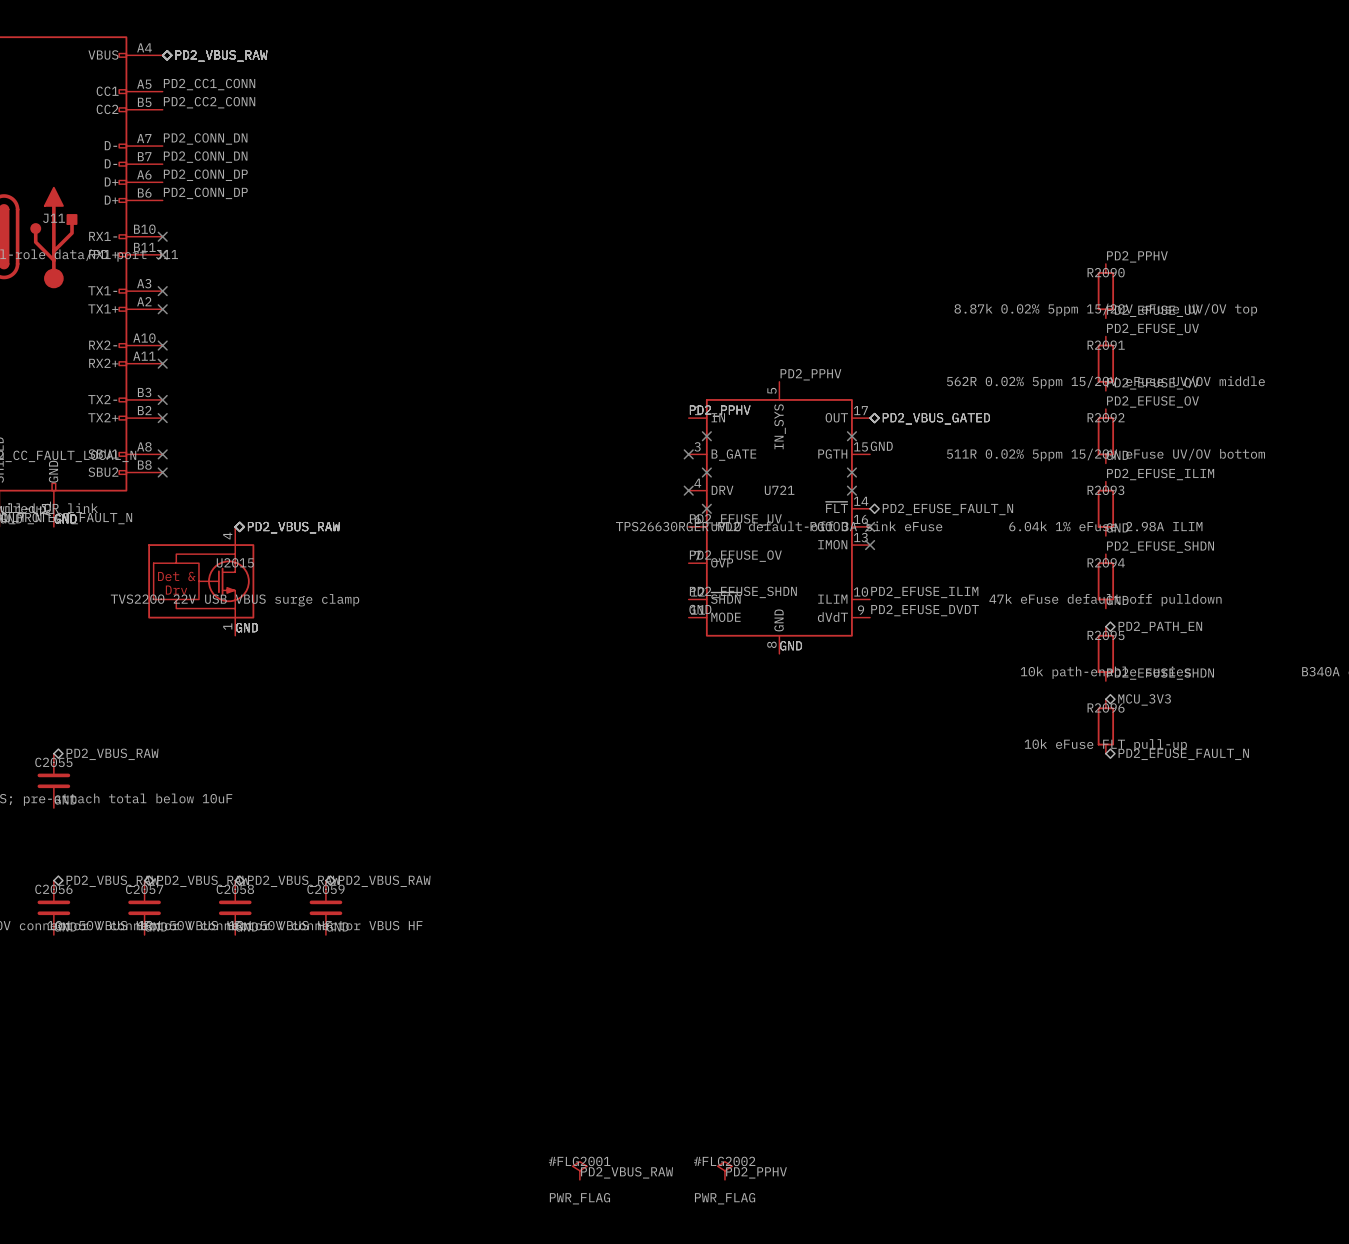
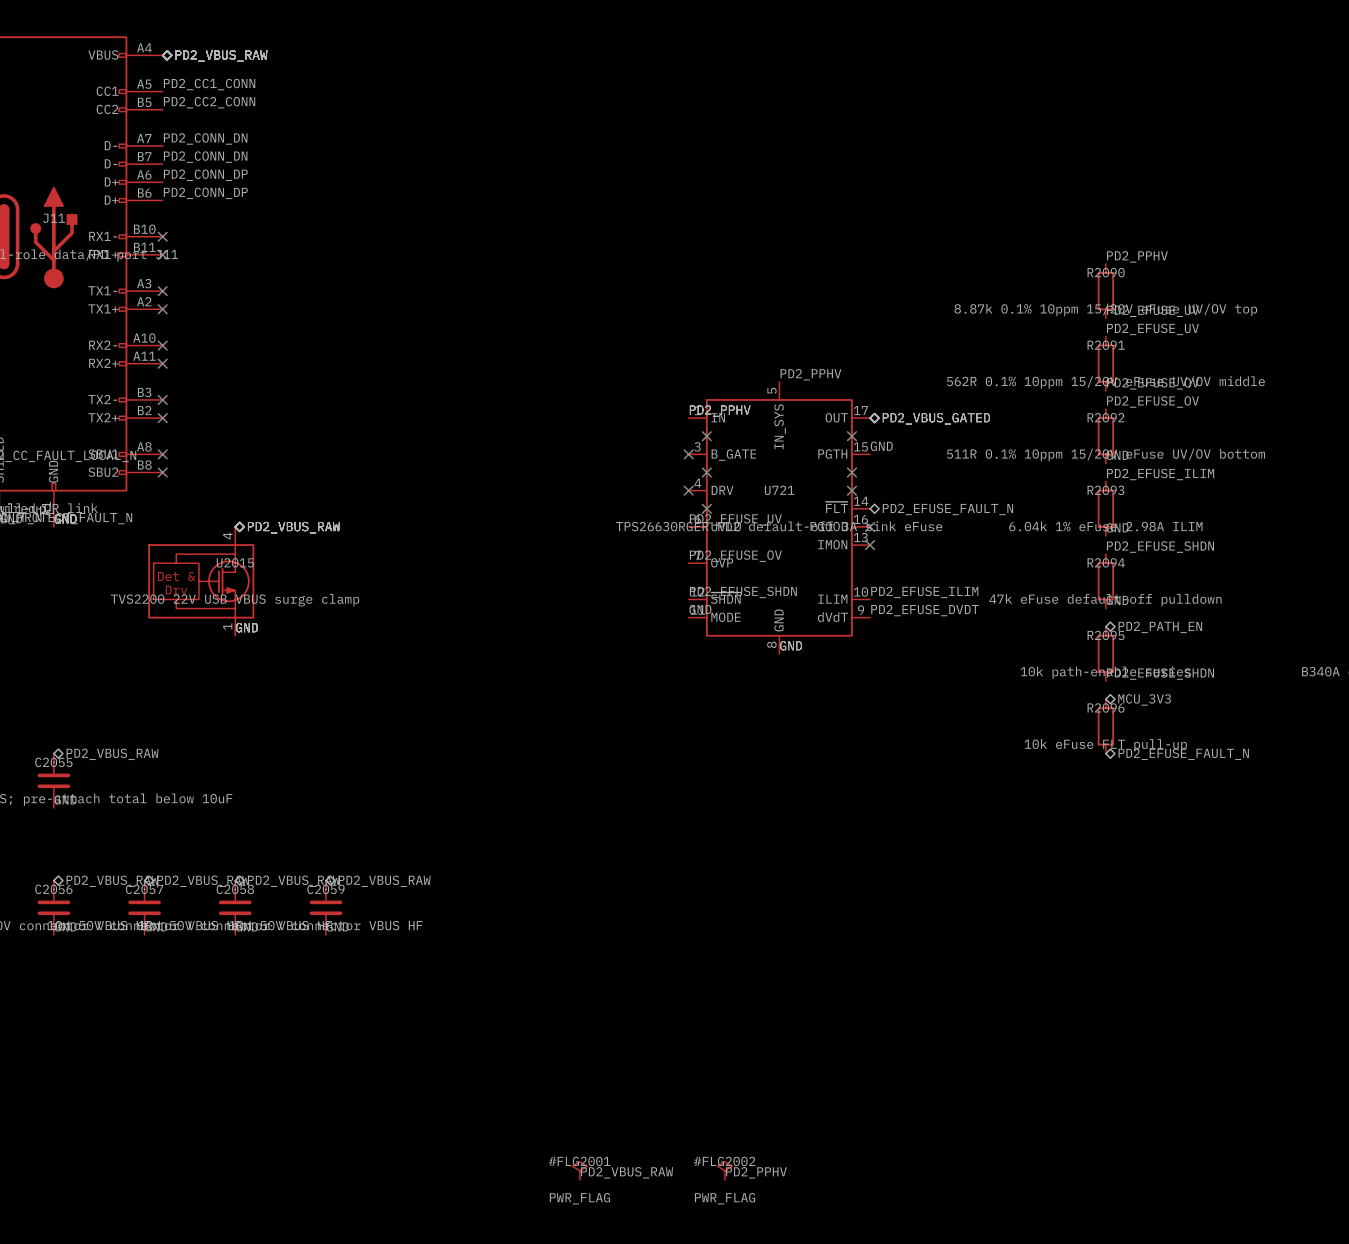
R2090 value: 8.87k 0.02% 5ppm 15/20V eFuse UV/OV top (1105, 309) -> 8.87k 0.1% 10ppm 15/20V eFuse UV/OV top (1105, 309)
R2091 value: 562R 0.02% 5ppm 15/20V eFuse UV/OV middle (1105, 382) -> 562R 0.1% 10ppm 15/20V eFuse UV/OV middle (1105, 382)
R2092 value: 511R 0.02% 5ppm 15/20V eFuse UV/OV bottom (1106, 454) -> 511R 0.1% 10ppm 15/20V eFuse UV/OV bottom (1106, 454)

